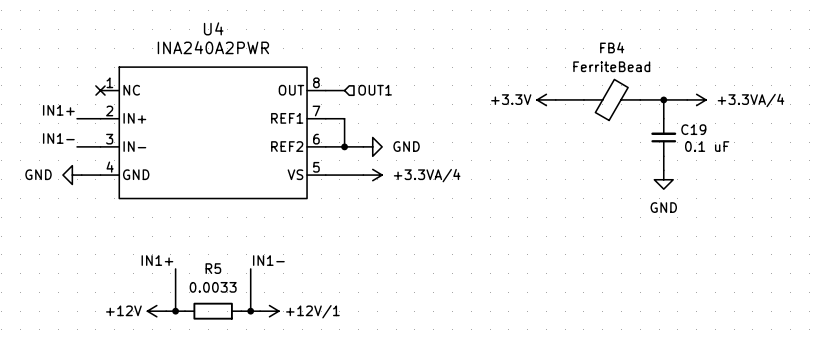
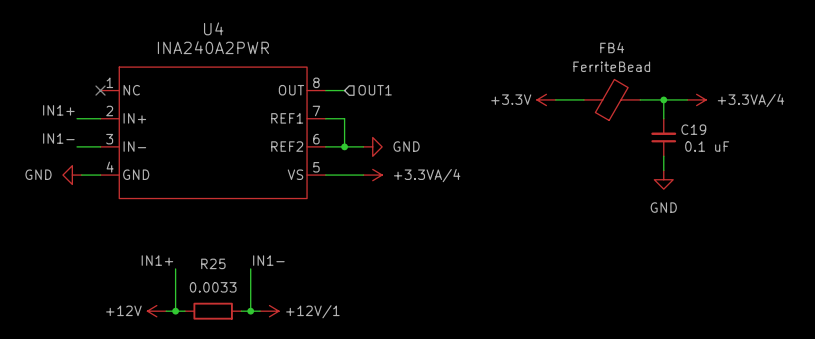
R5 name: R5 (213, 268) -> R25 (213, 263)

